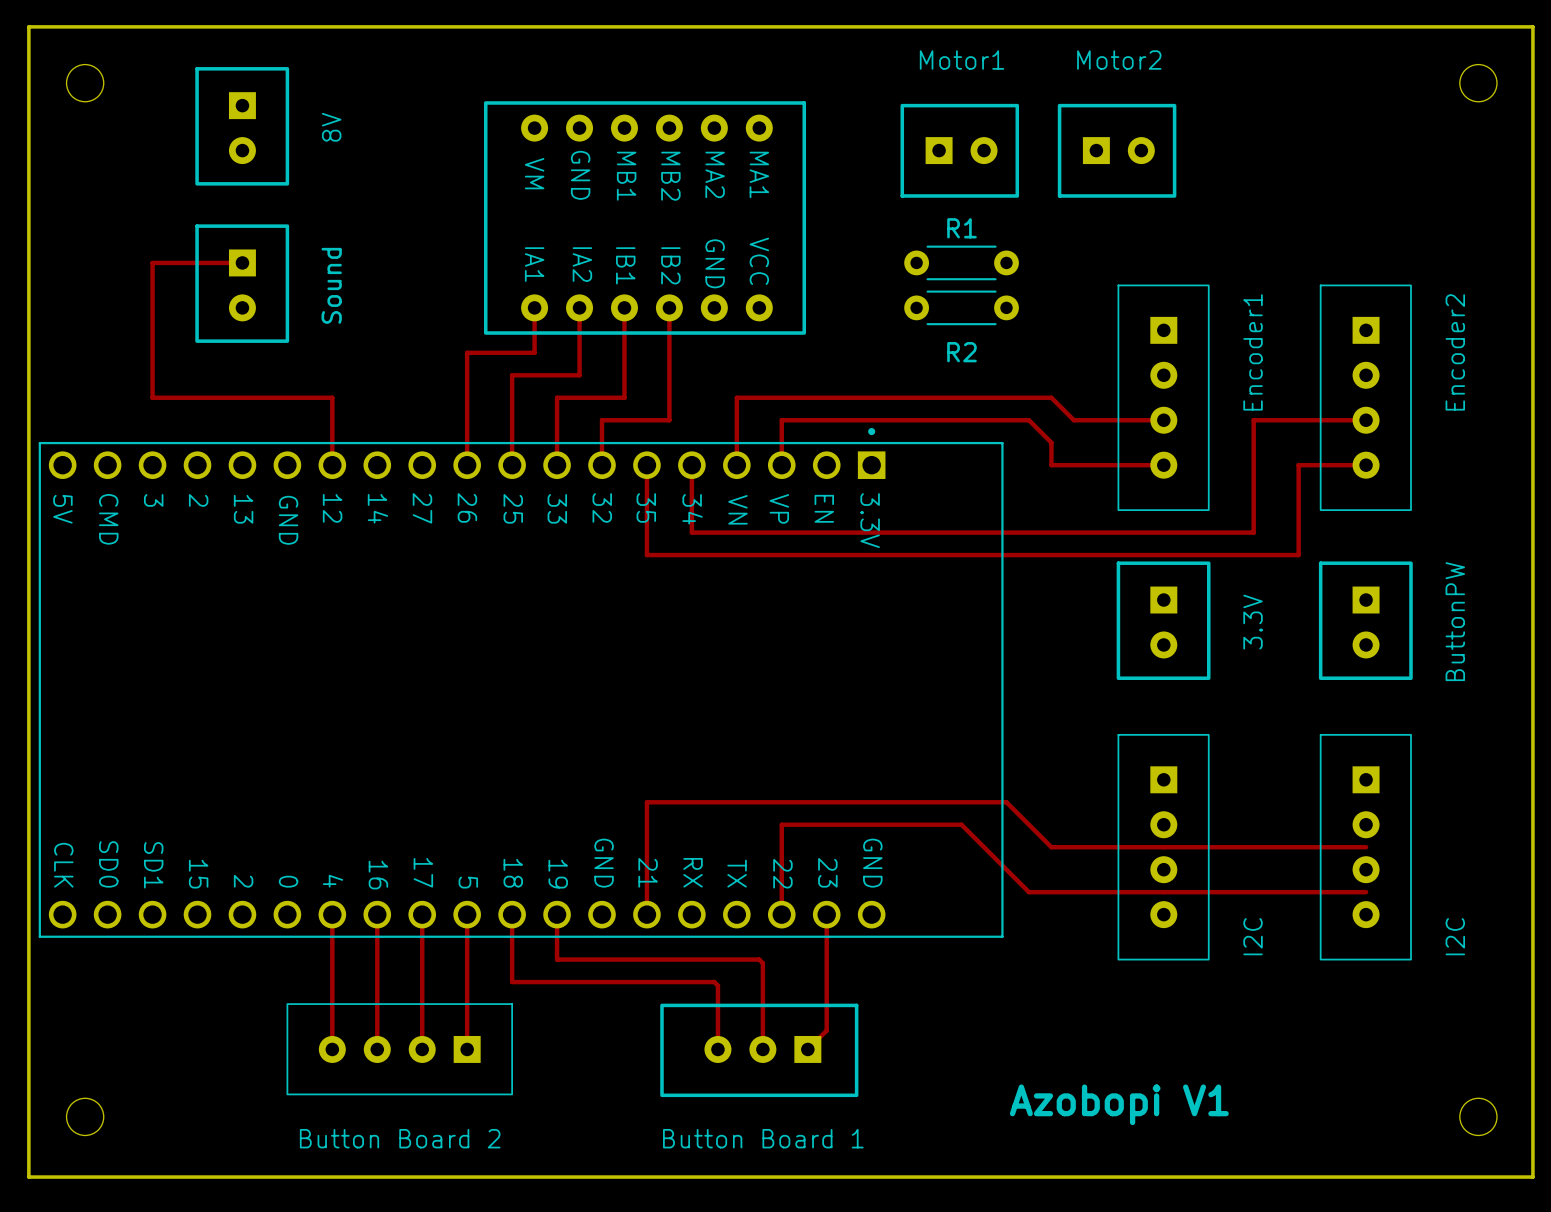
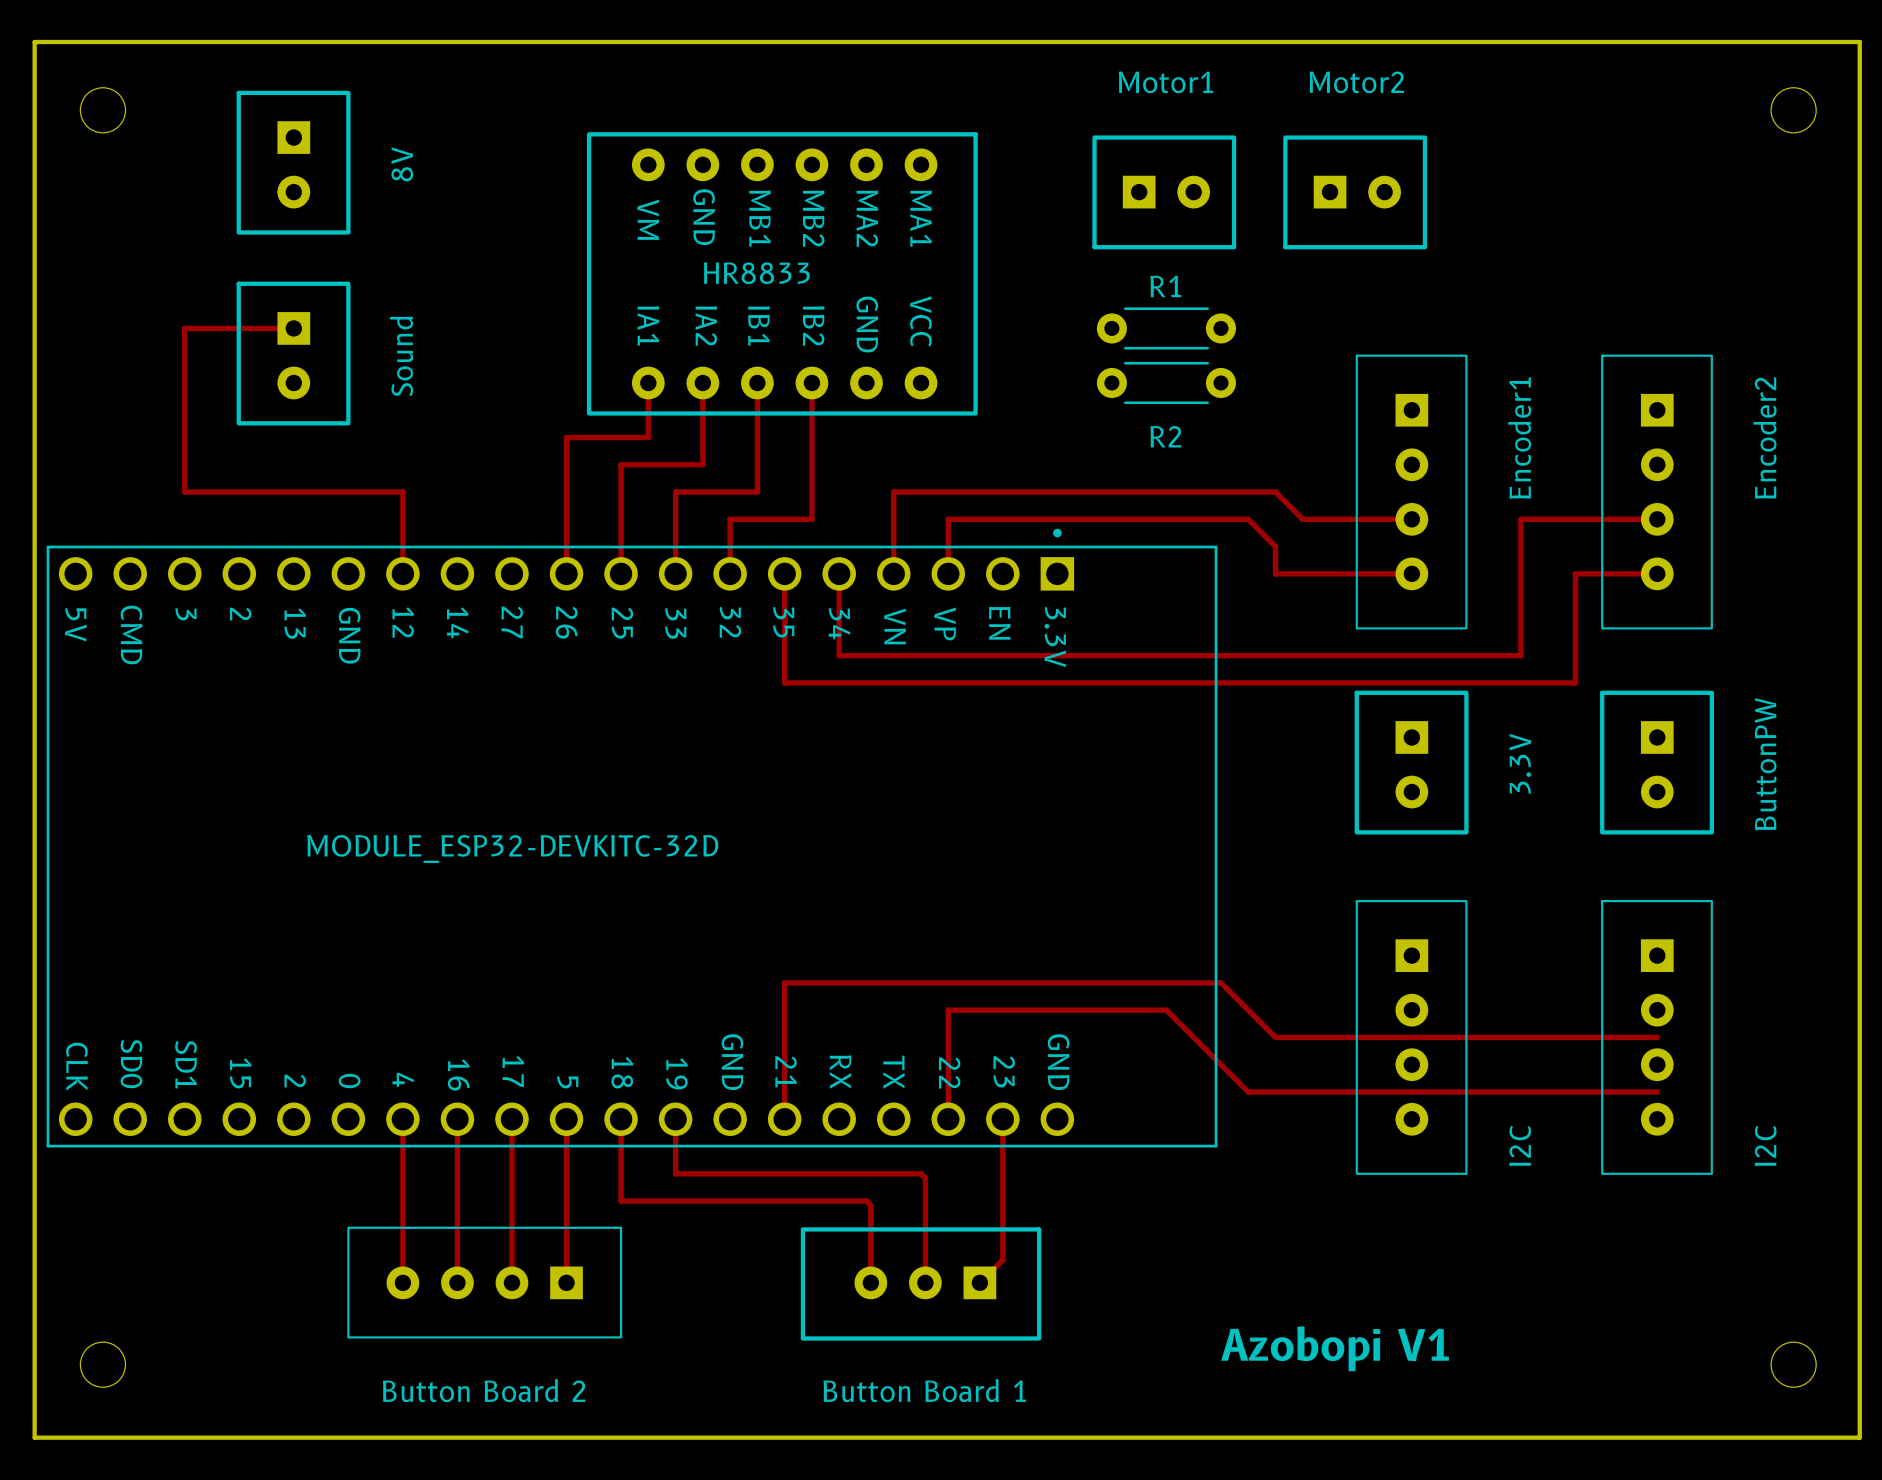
part value: none -> HR8833 (756, 273)
part value: none -> MODULE_ESP32-DEVKITC-32D (512, 848)

